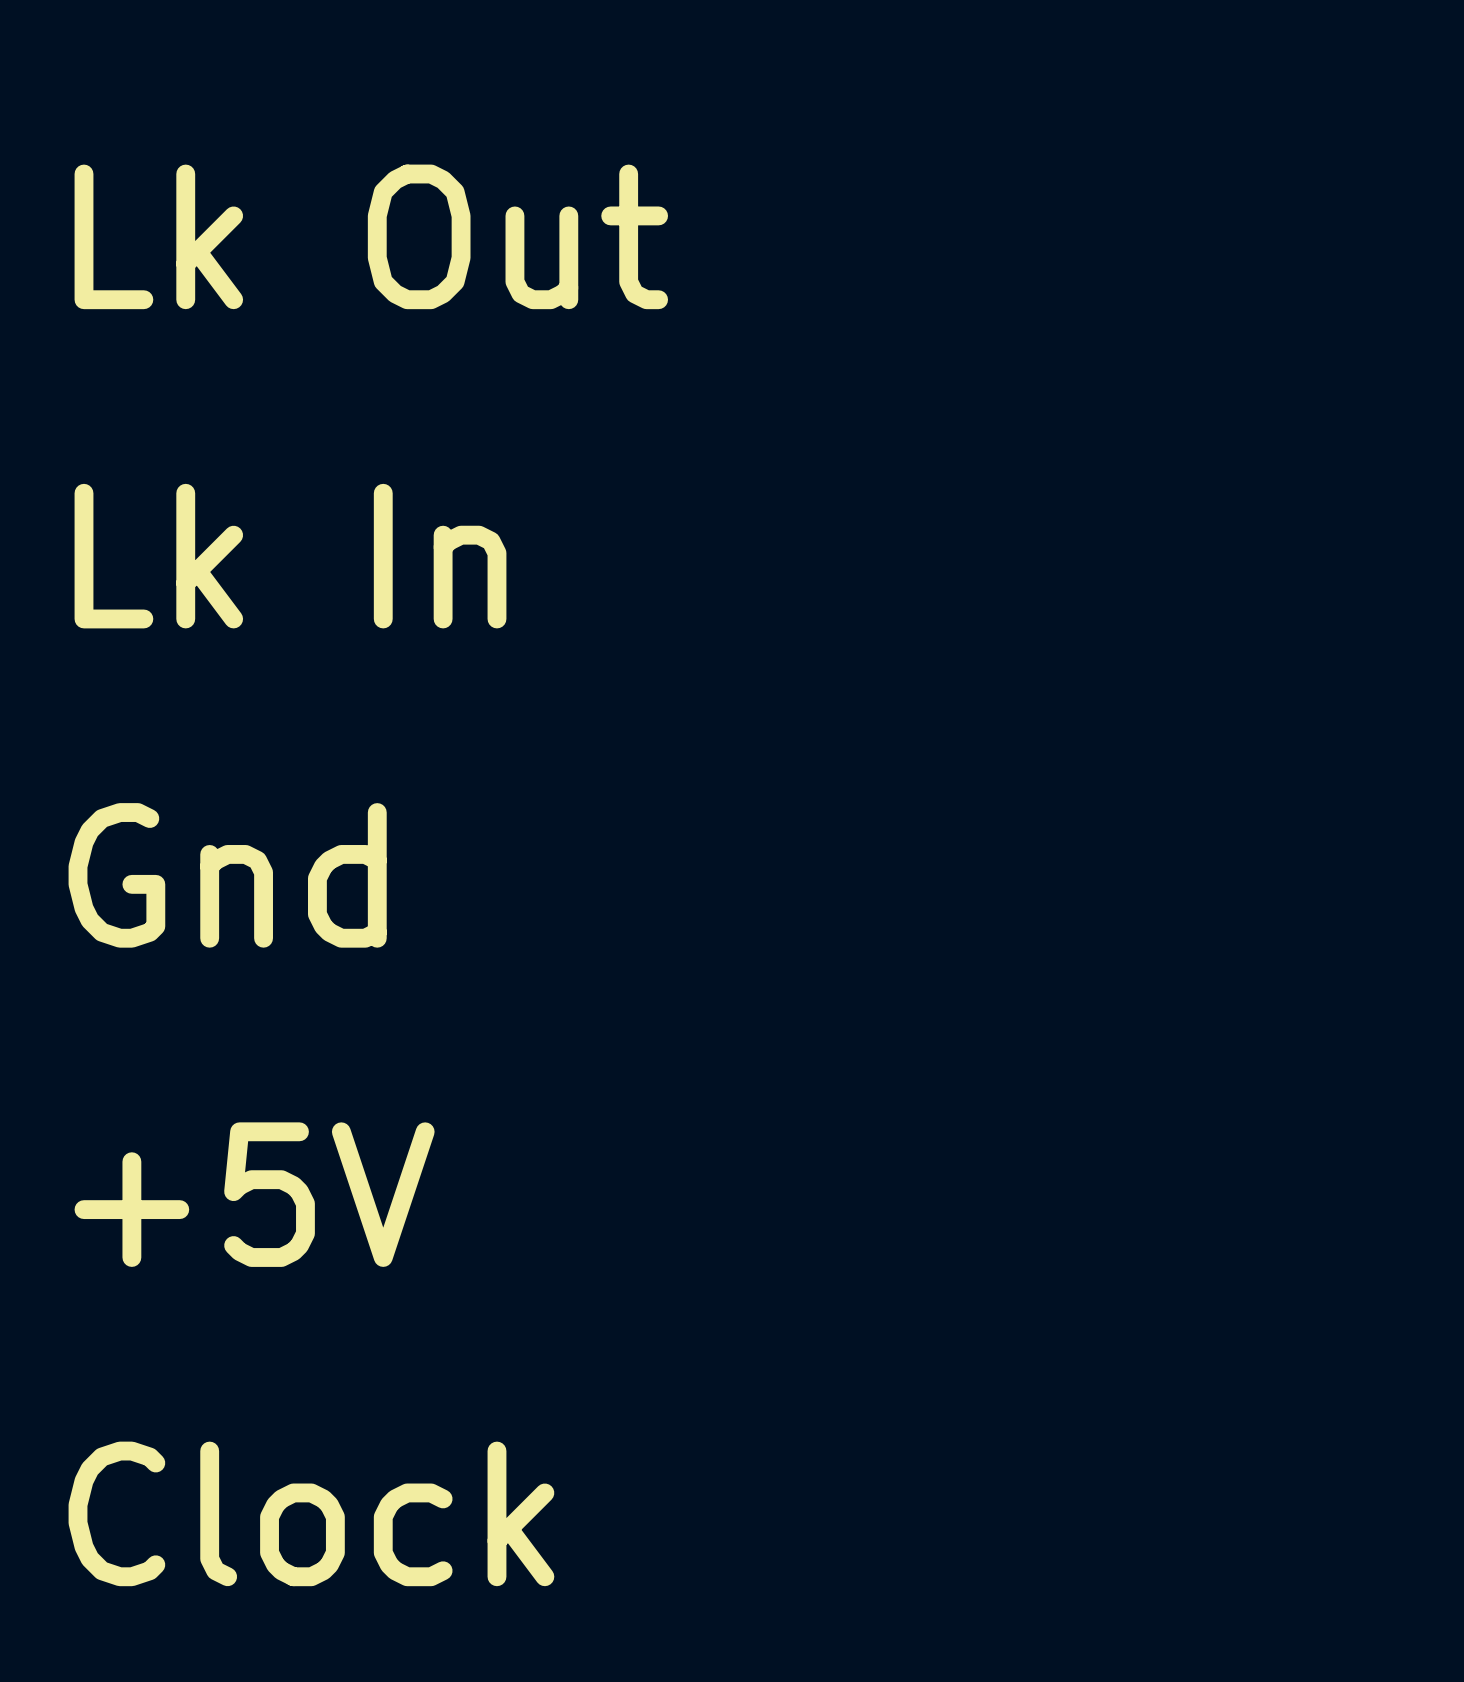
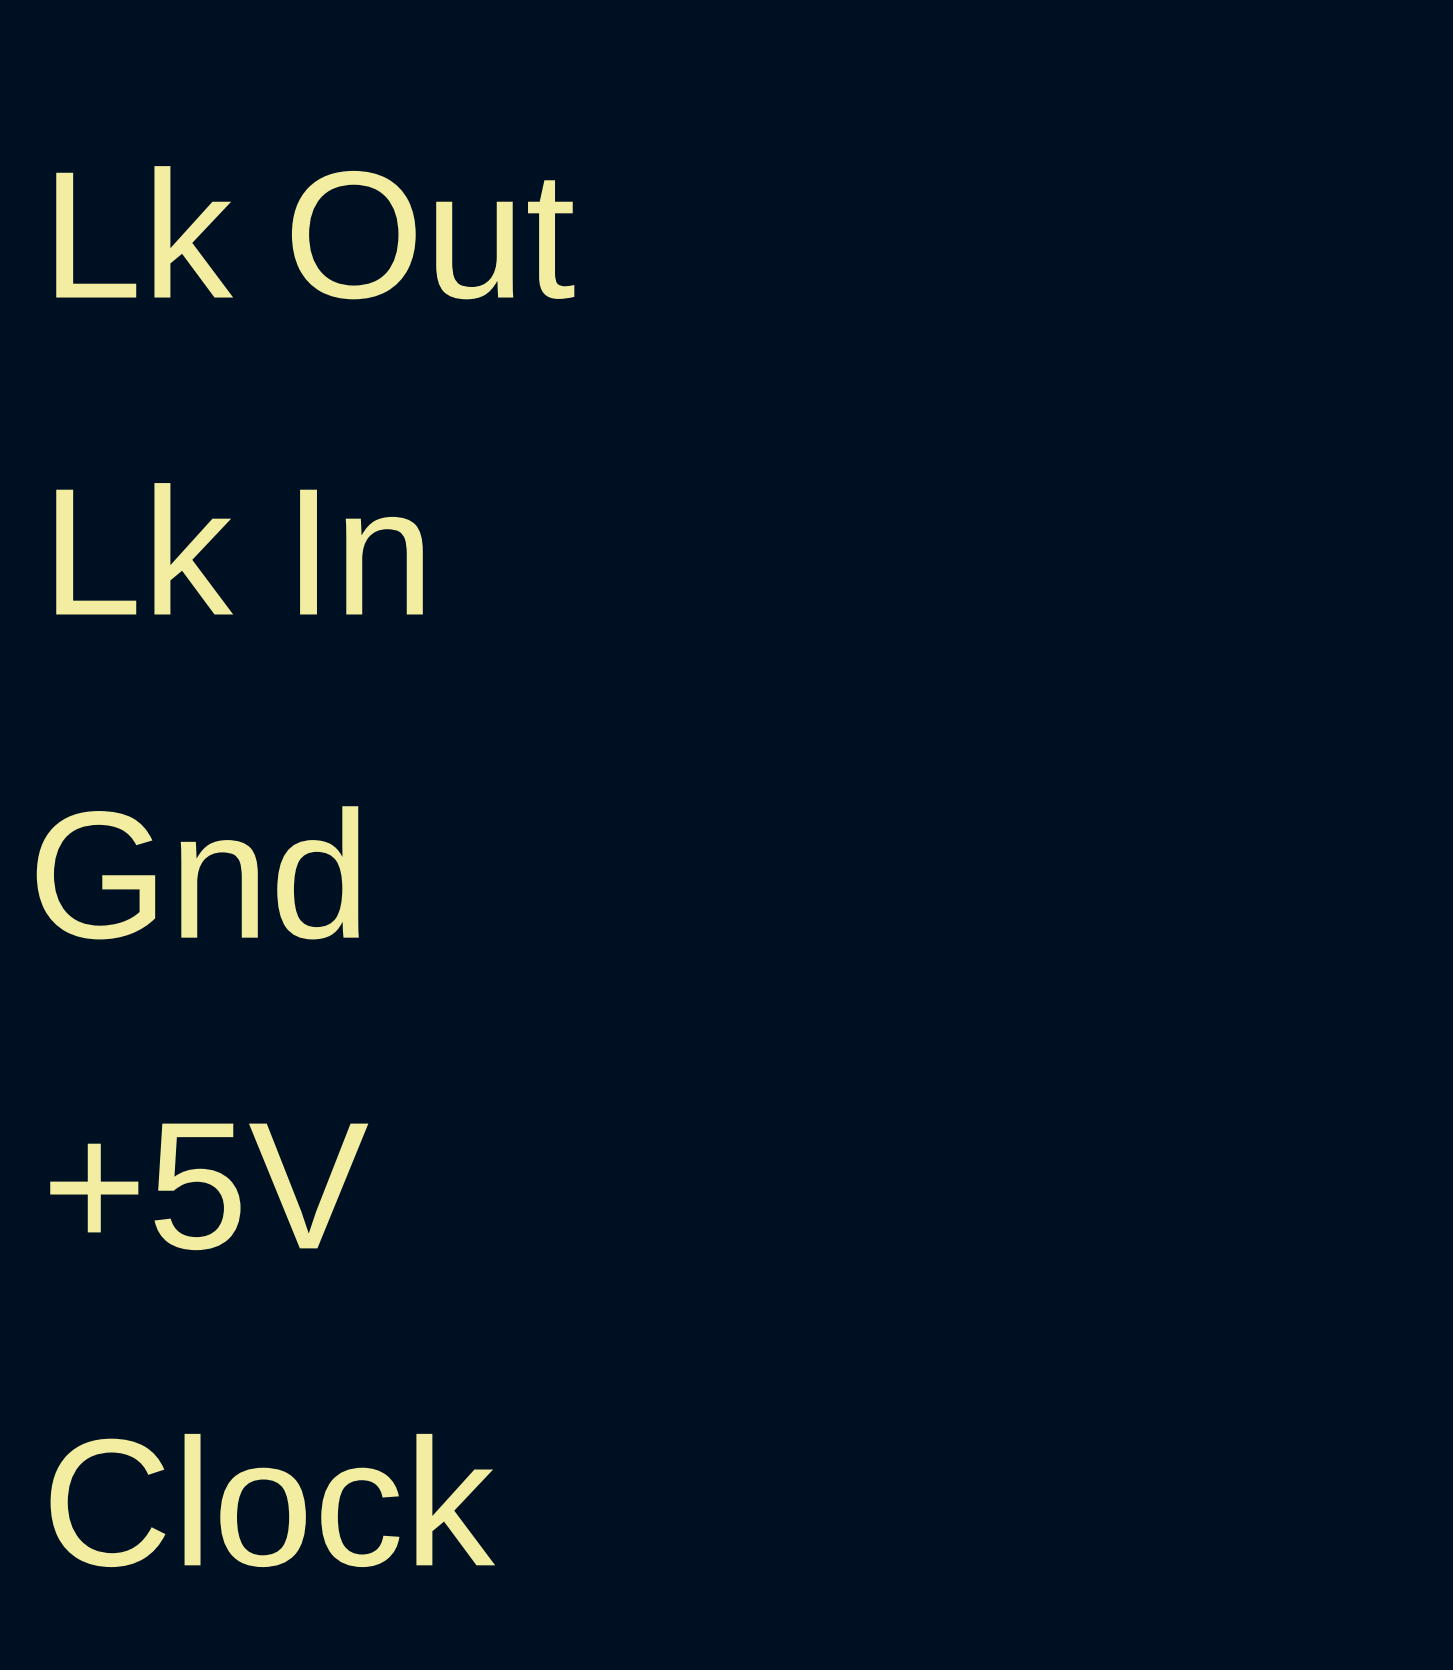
text position: Gnd (227, 875) -> Gnd (197, 872)

